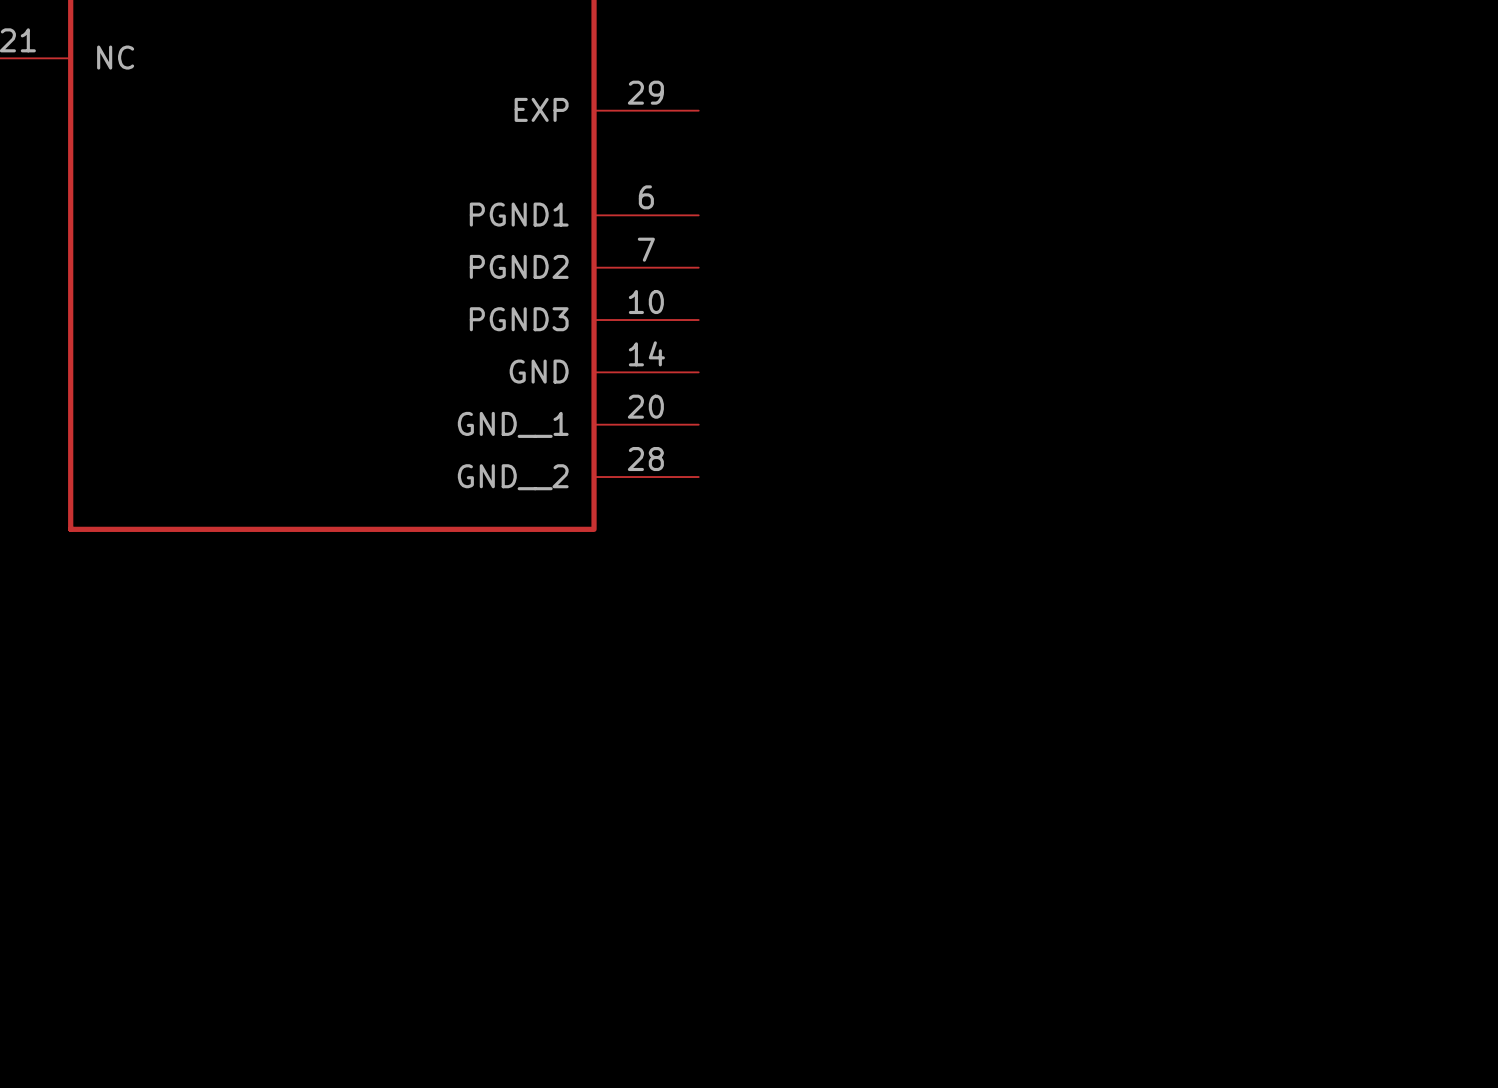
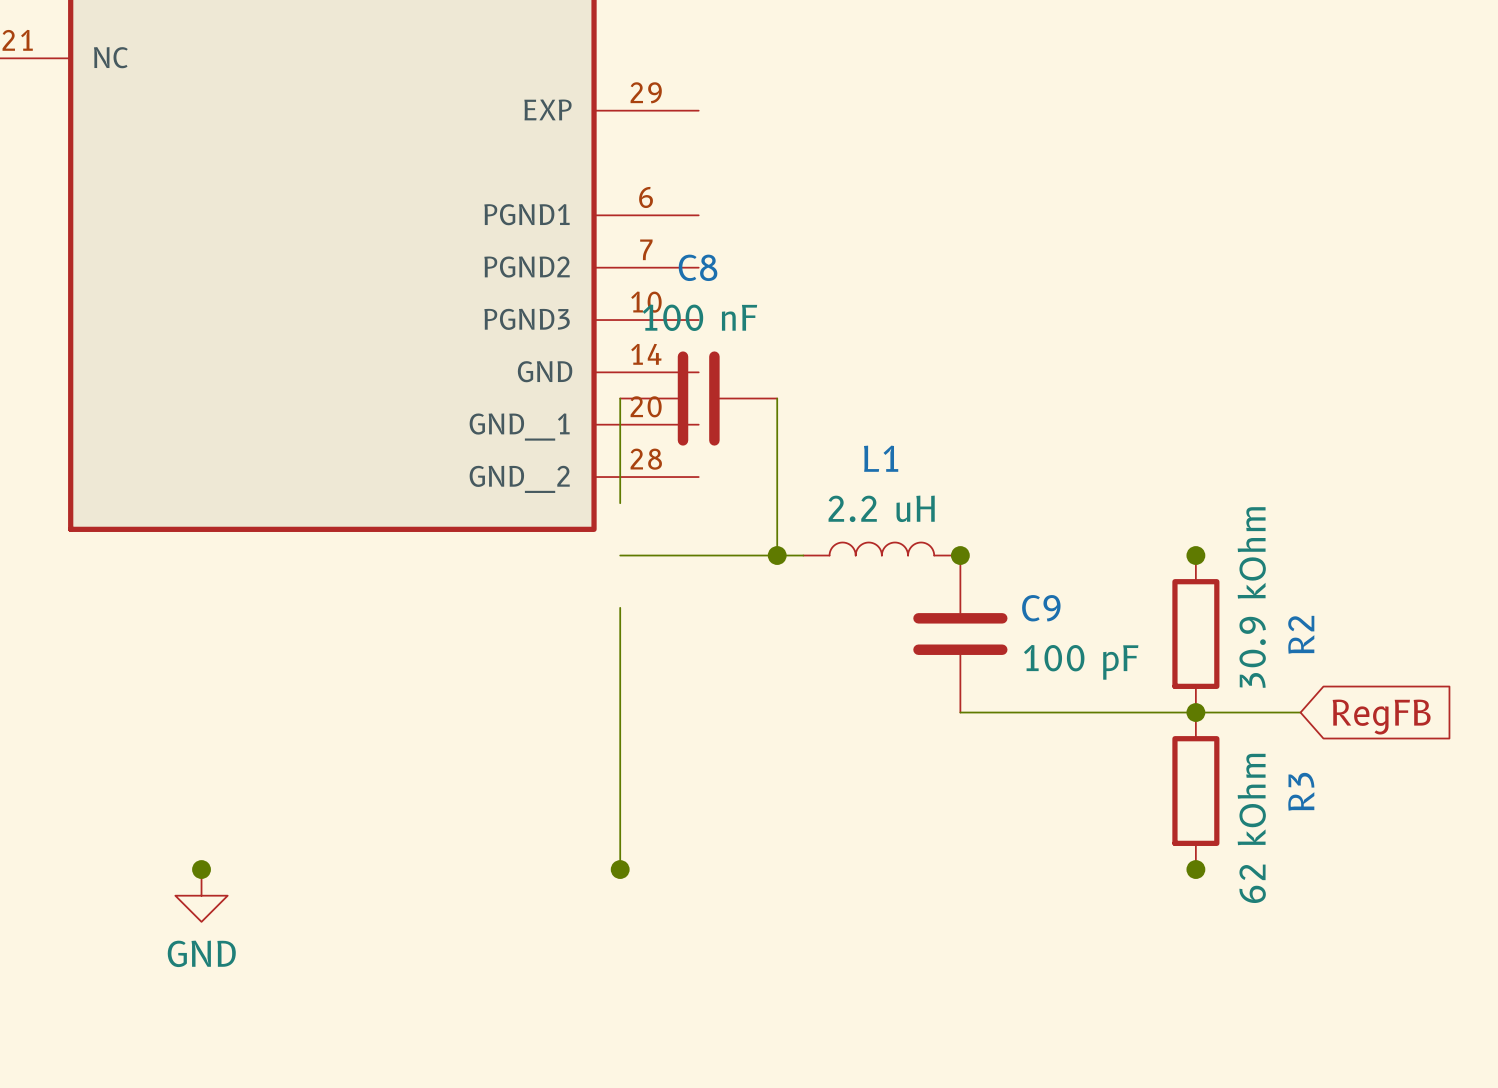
wire: none -> (620, 398) (620, 503)
C8: none -> 100 nF (698, 398)
wire: none -> (777, 398) (777, 555)
L1: none -> 2.2 uH (881, 549)
wire: none -> (620, 555) (803, 555)
junction: none -> (777, 555)
junction: none -> (960, 555)
junction: none -> (1195, 555)
wire: none -> (620, 607) (620, 869)
C9: none -> 100 pF (960, 634)
R2: none -> 30.9 kOhm (1195, 634)
wire: none -> (960, 712) (1300, 712)
junction: none -> (1195, 712)
global label: none -> RegFB (1381, 717)
R3: none -> 62 kOhm (1195, 791)
junction: none -> (201, 869)
junction: none -> (620, 869)
junction: none -> (1195, 869)
power symbol: none -> GND (201, 895)

